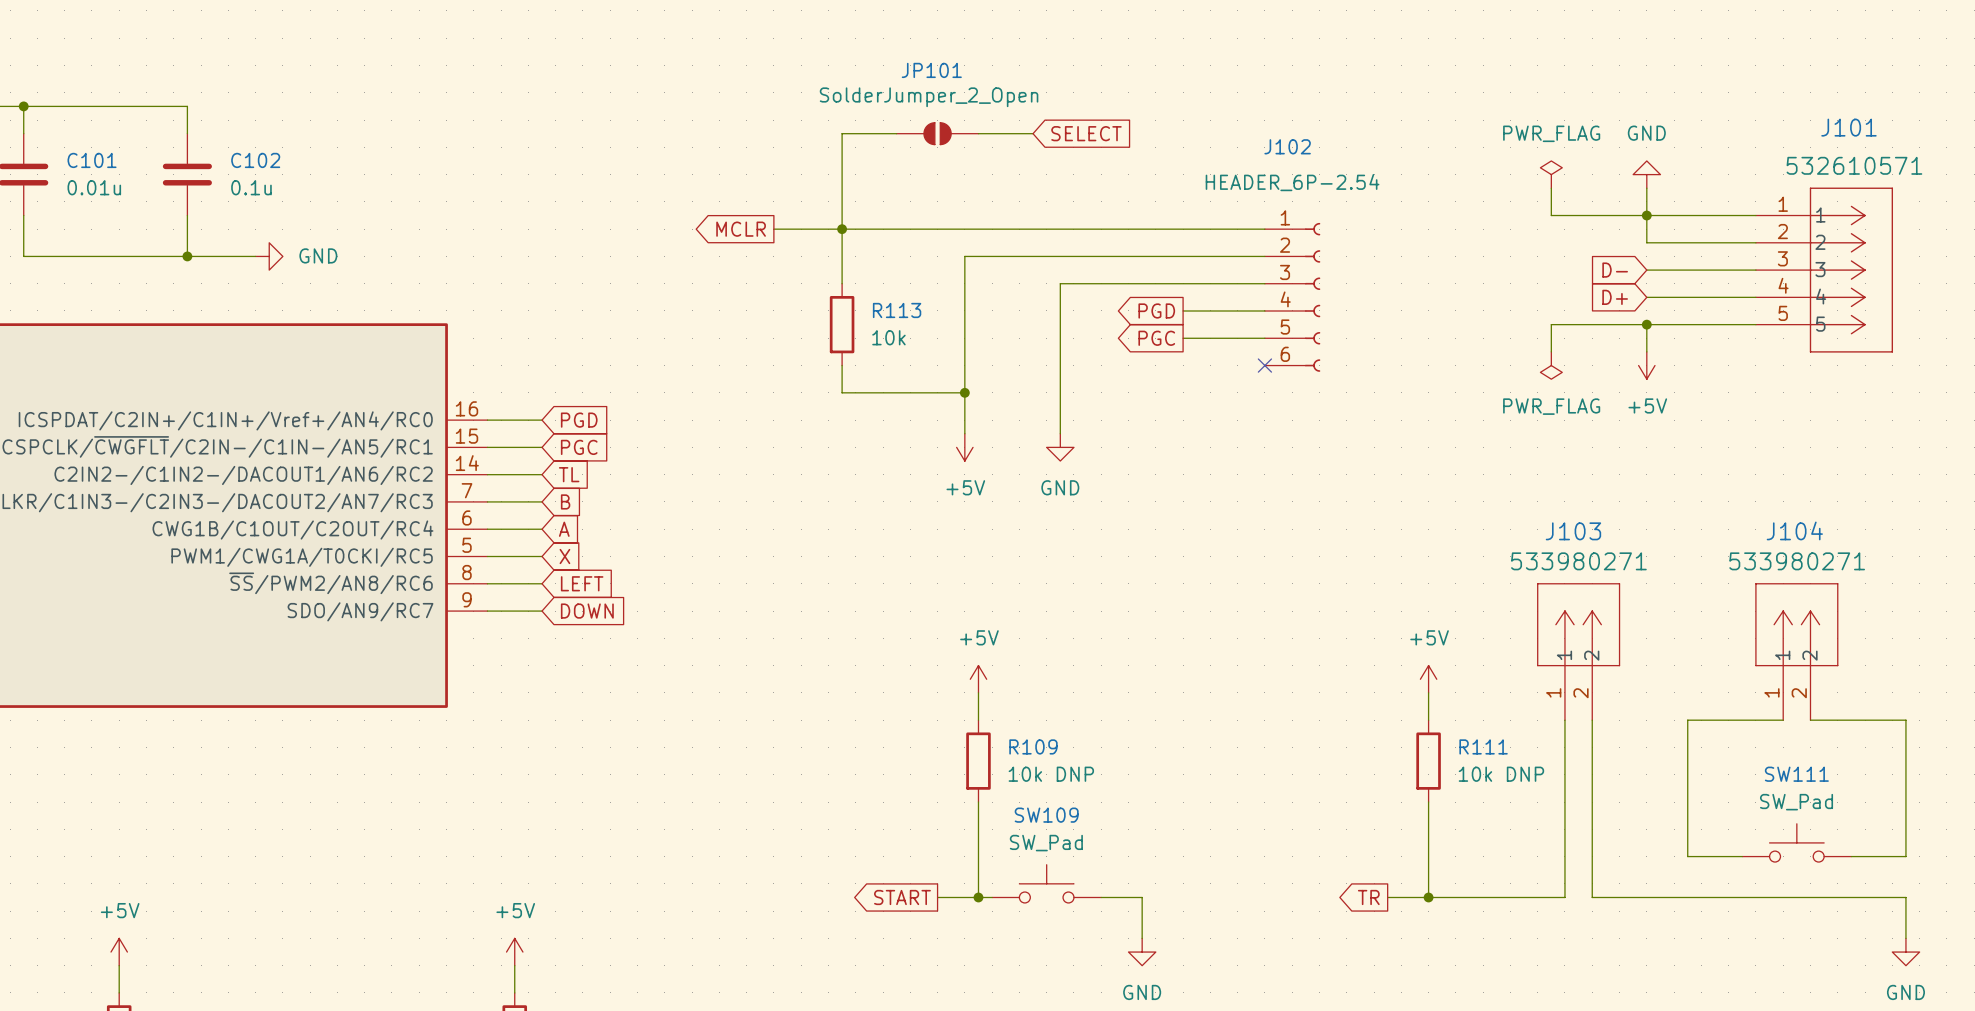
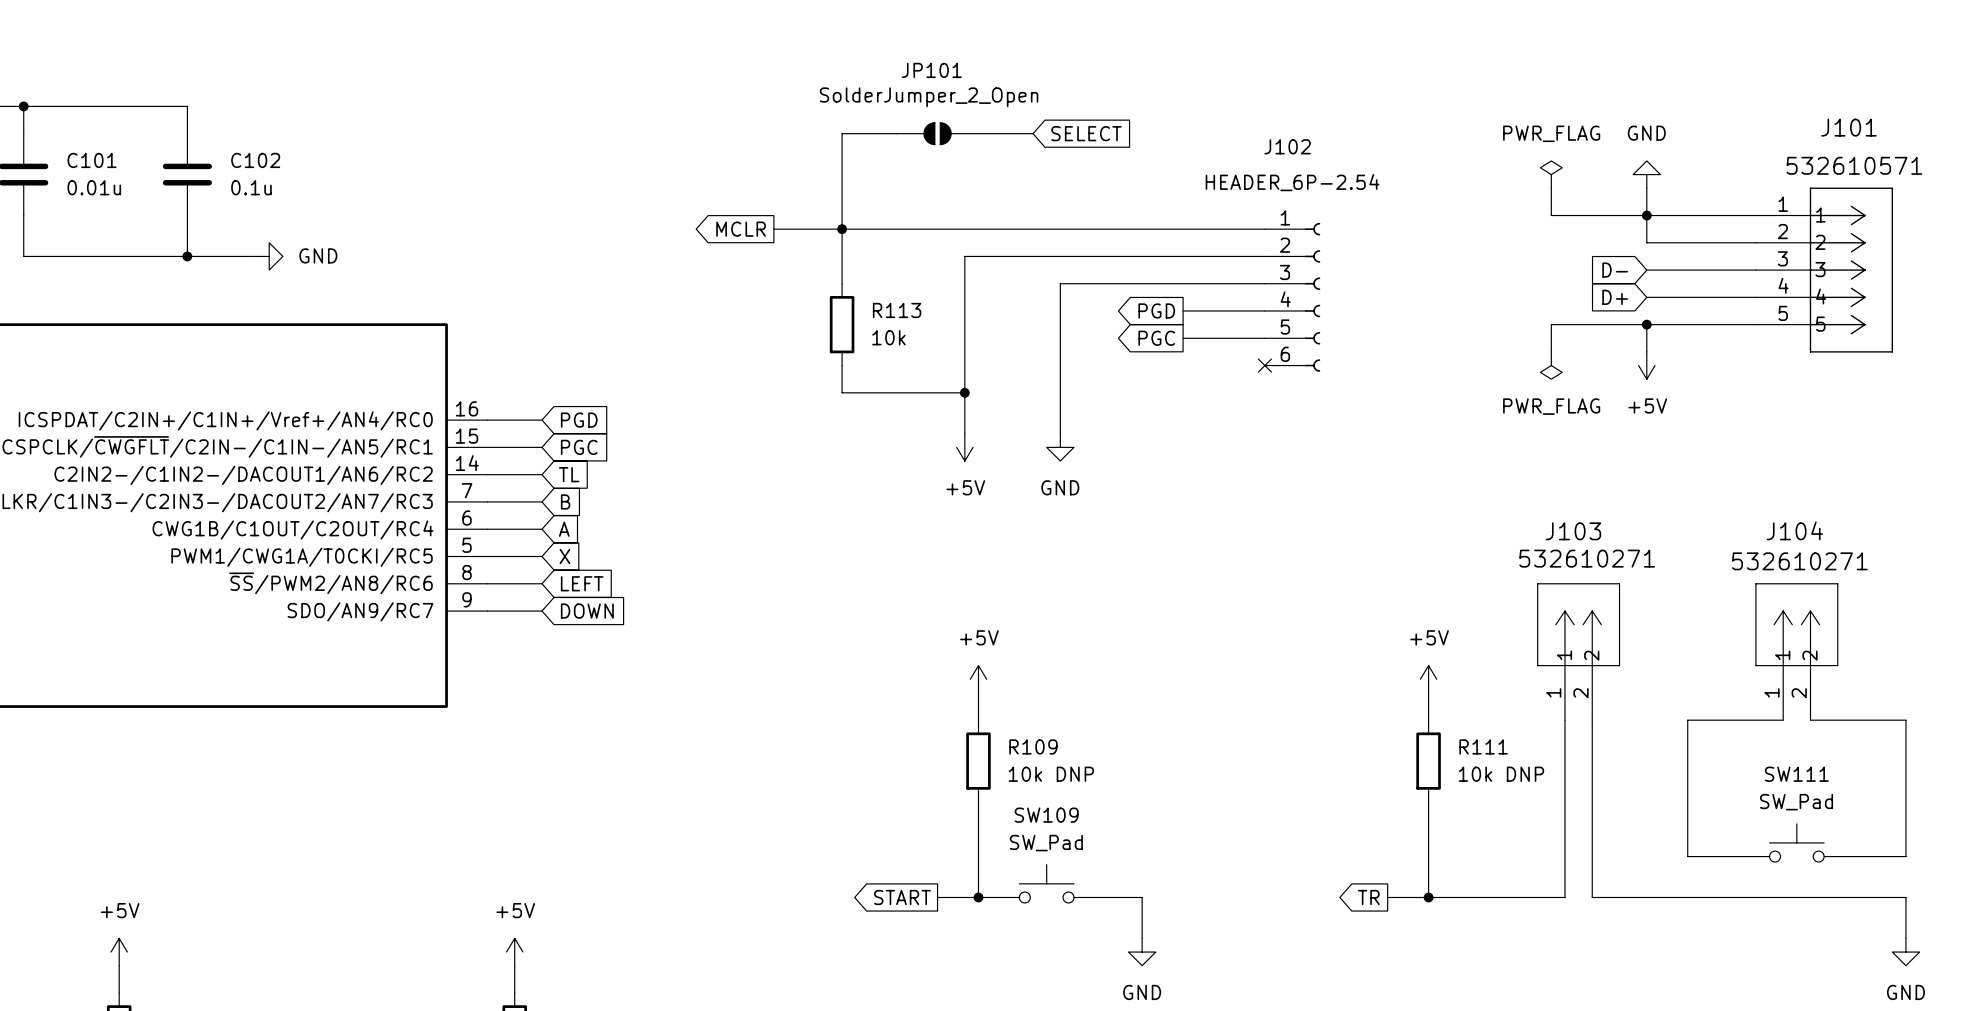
J103 value: 533980271 (1578, 561) -> 532610271 (1587, 558)
J104 value: 533980271 (1797, 561) -> 532610271 (1799, 561)

